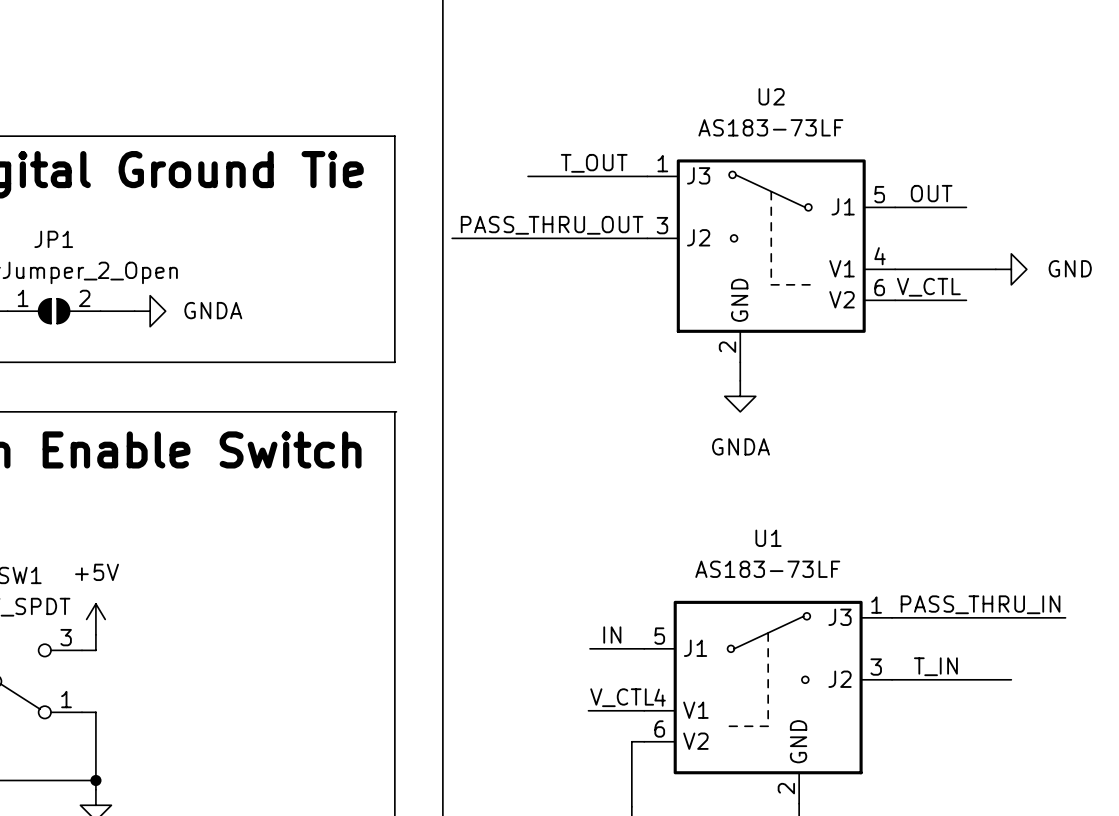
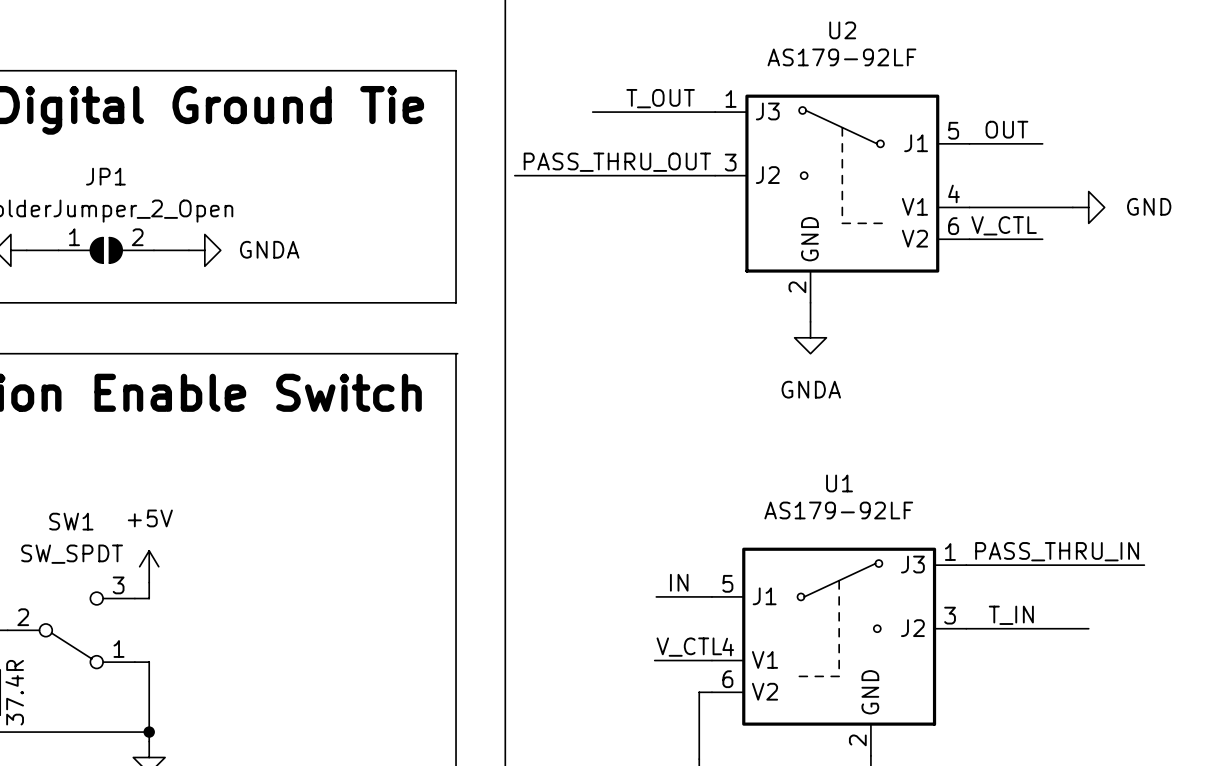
U2 value: AS183-73LF (770, 127) -> AS179-92LF (841, 57)
U1 value: AS183-73LF (767, 569) -> AS179-92LF (838, 510)

